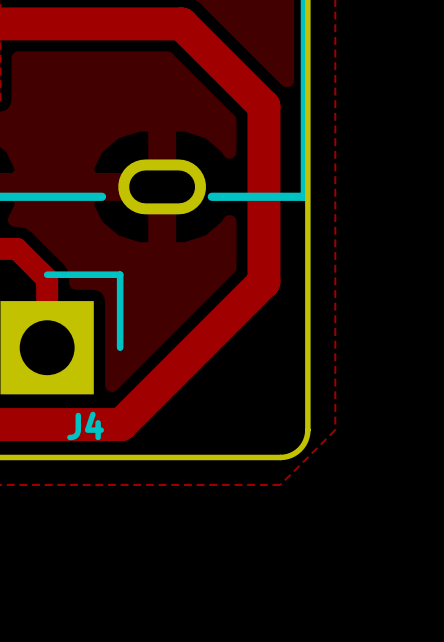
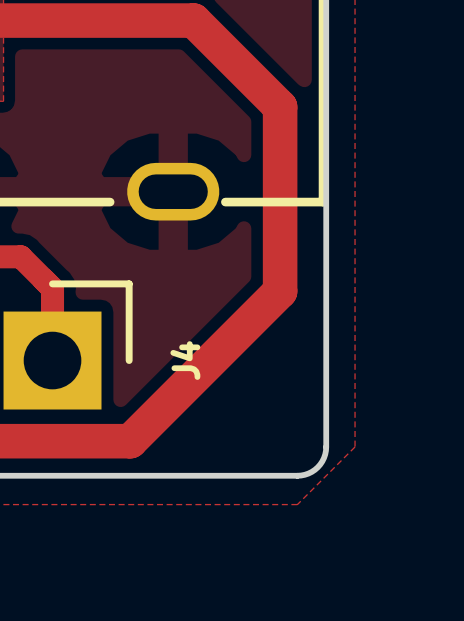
J4 name rotation: 0° (85, 425) -> 90° counterclockwise (185, 360)
J4 name position: J4 (85, 425) -> J4 (185, 360)

